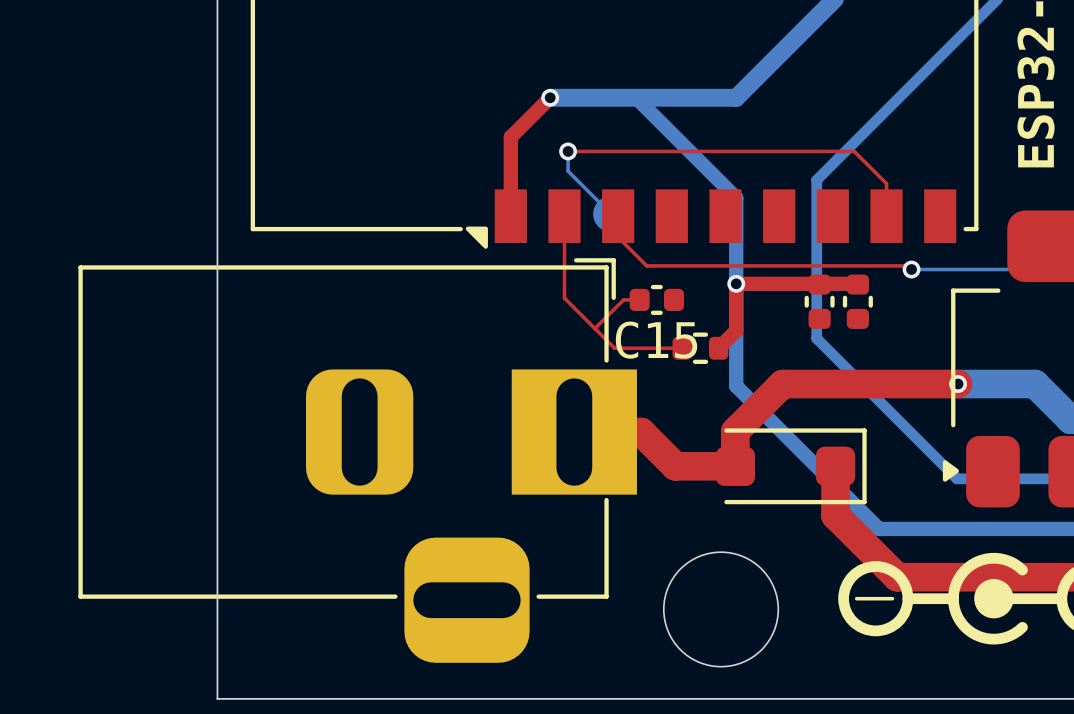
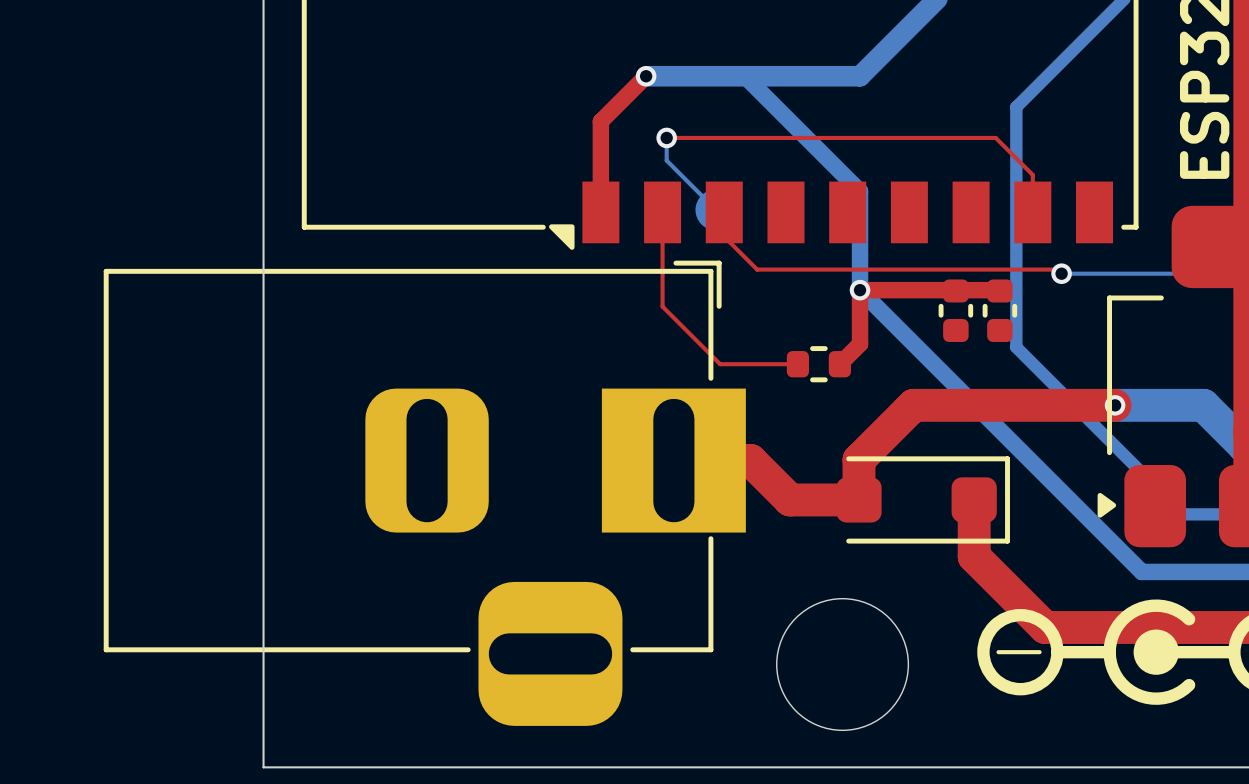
bottom track: (872, 124) (816, 180) (816, 338) (957, 478) (1017, 478) -> (1016, 107) (1016, 347) (1183, 514)
bottom track: (736, 283) (736, 386) (879, 528) (981, 528) -> (860, 290) (1141, 571)
top track: (639, 299) (623, 299) (594, 328) -> none
C15: (656, 299) -> none

